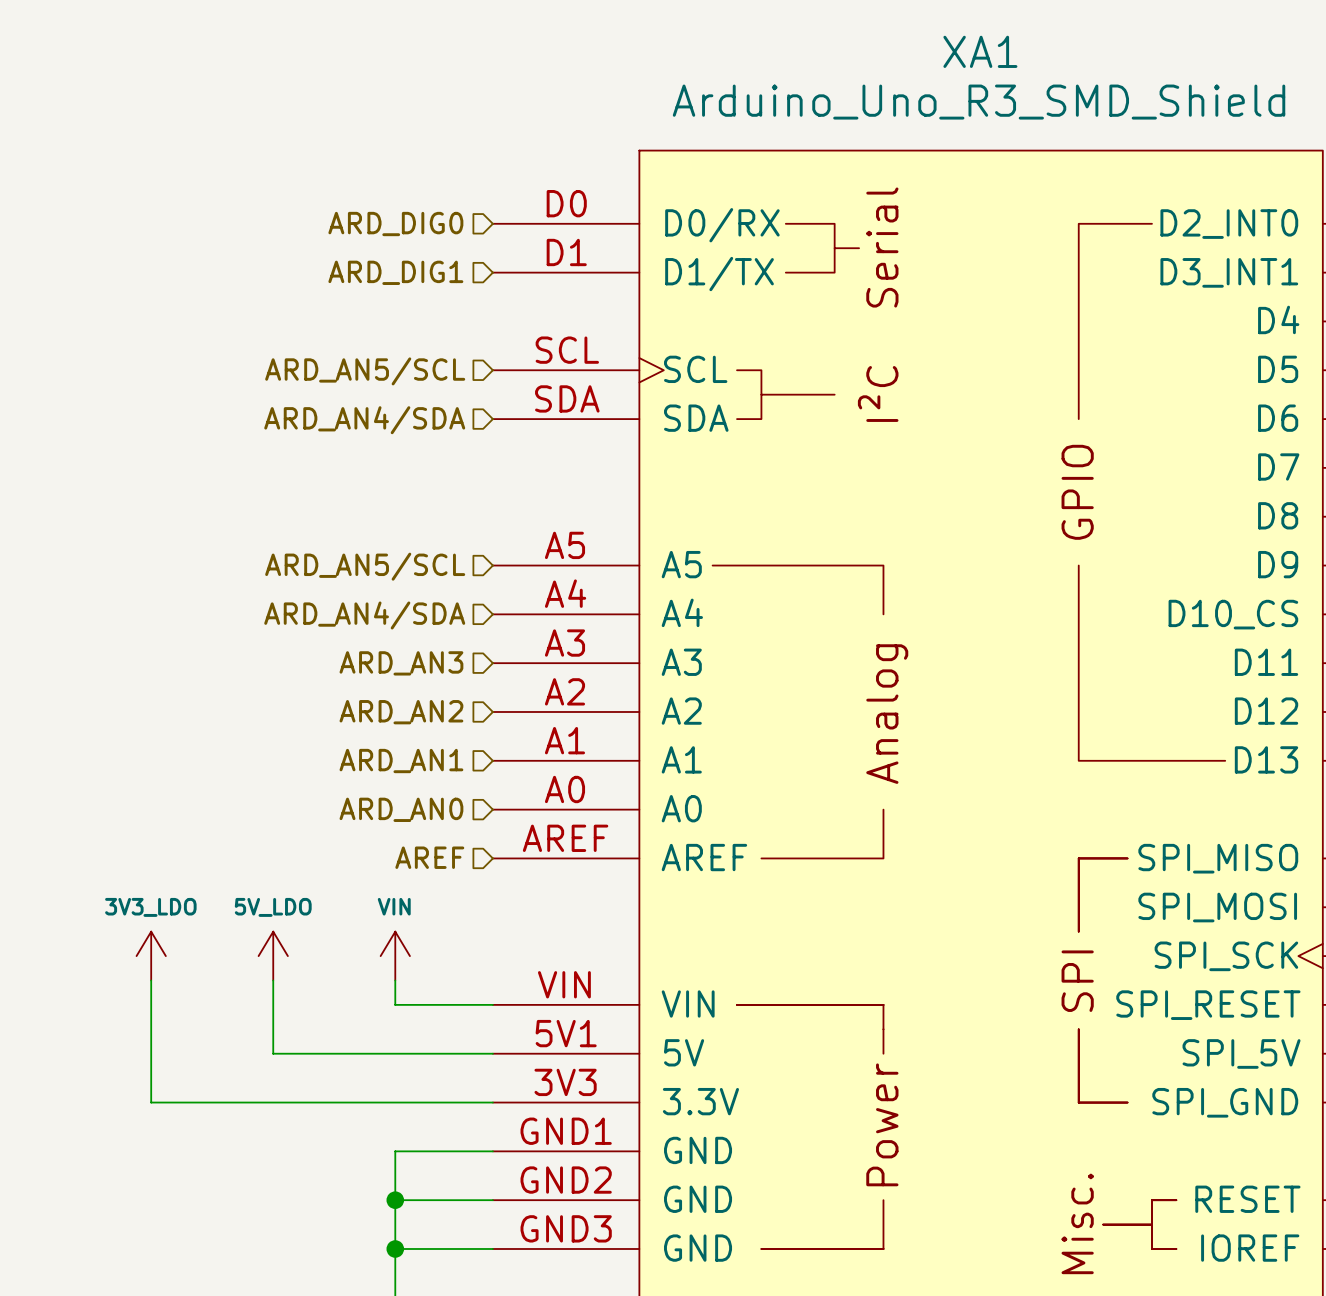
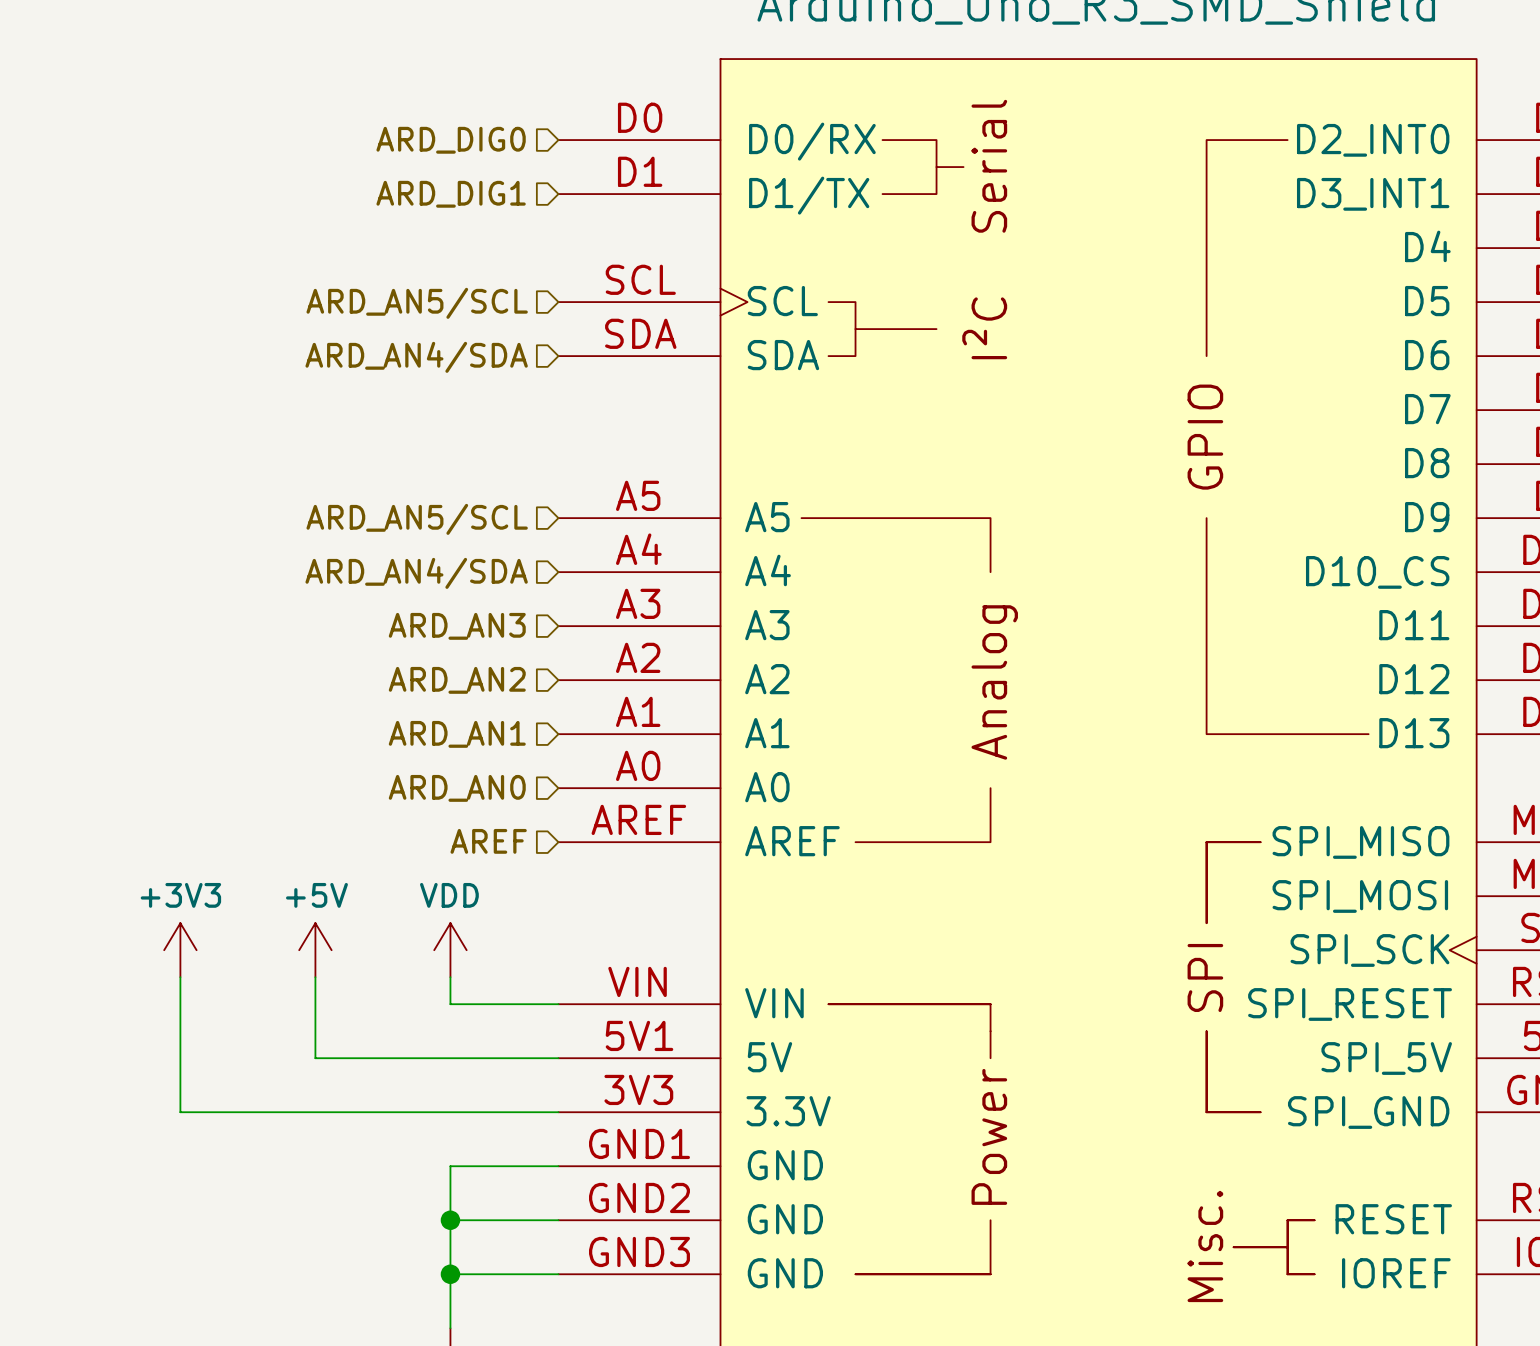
power symbol: 3V3_LDO (151, 956) -> +3V3 (180, 950)
power symbol: 5V_LDO (273, 956) -> +5V (315, 950)
power symbol: VIN (395, 956) -> VDD (450, 950)

